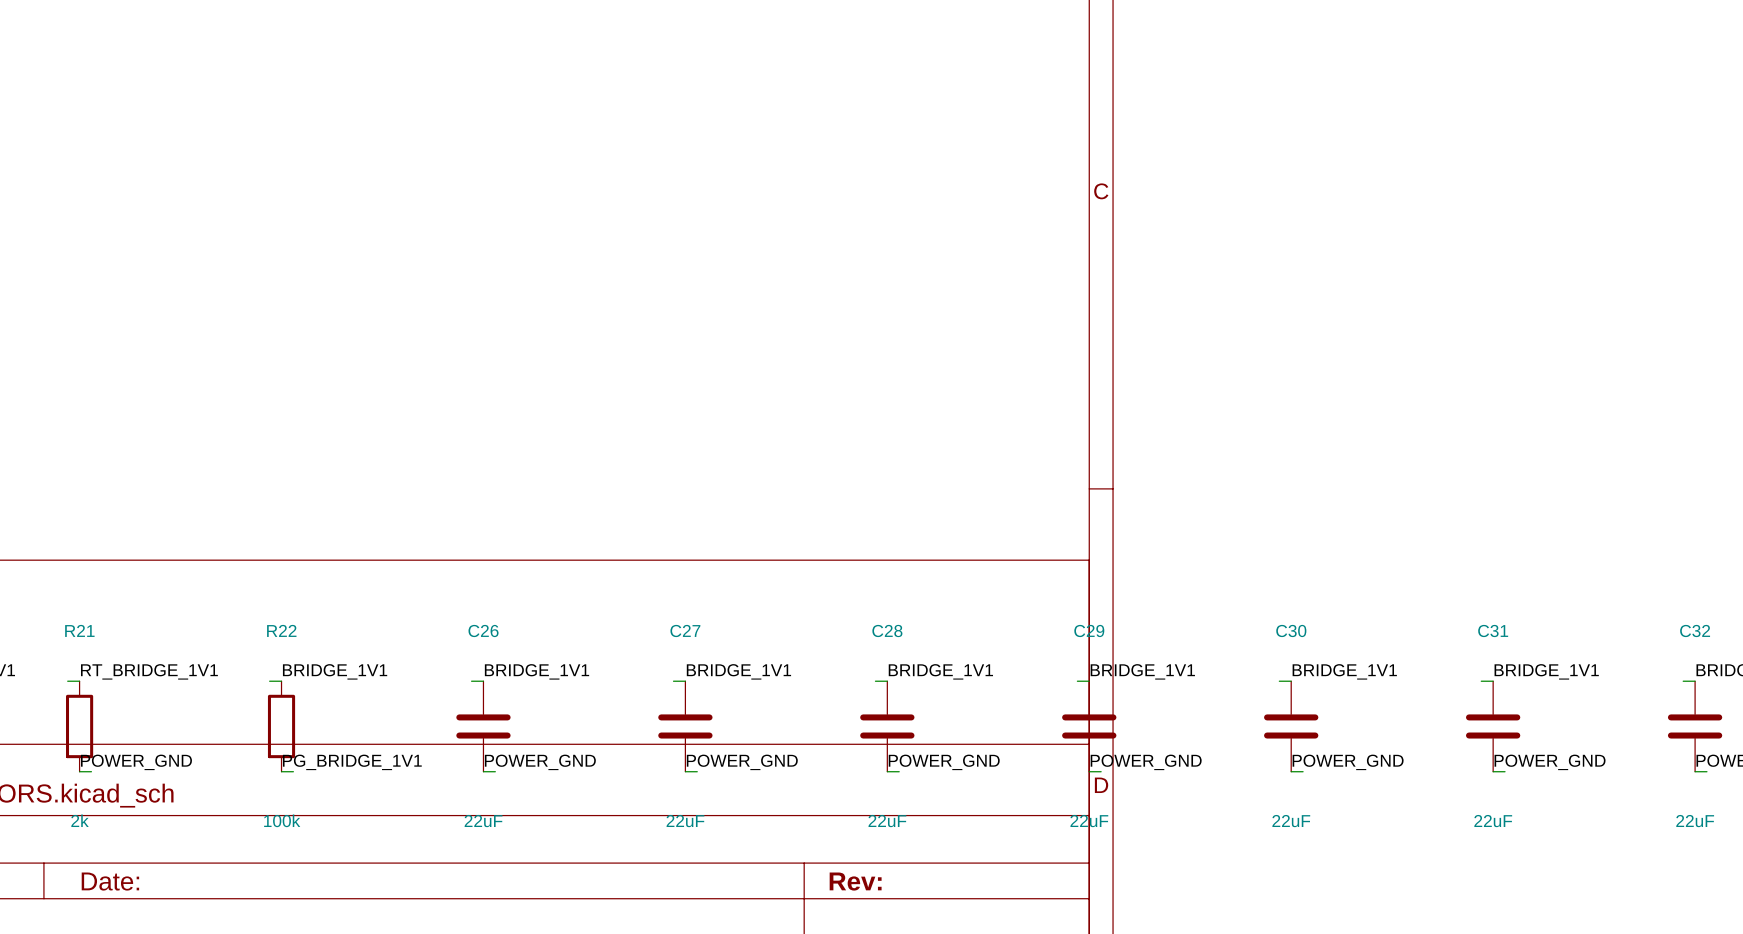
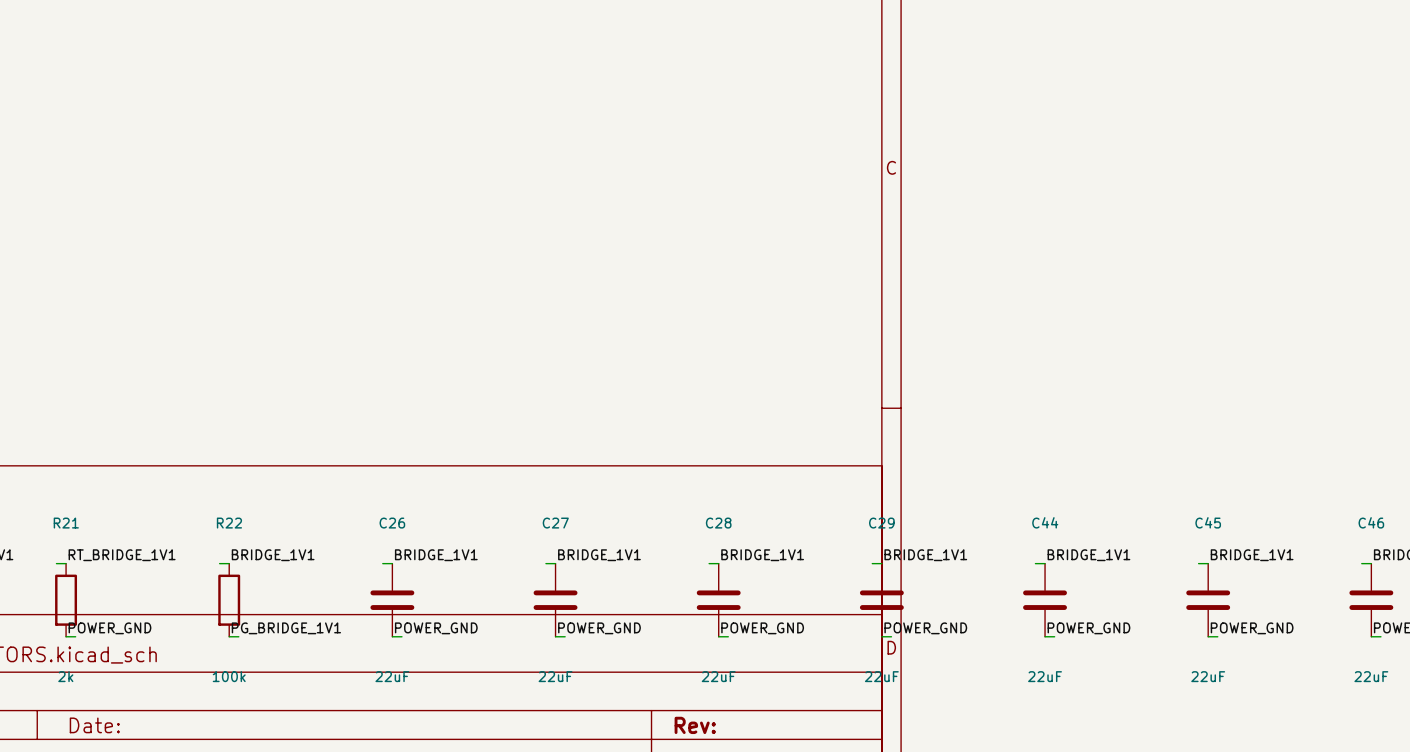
C30 name: C30 (1291, 631) -> C44 (1045, 522)
C31 name: C31 (1493, 631) -> C45 (1208, 522)
C32 name: C32 (1695, 631) -> C46 (1371, 522)

